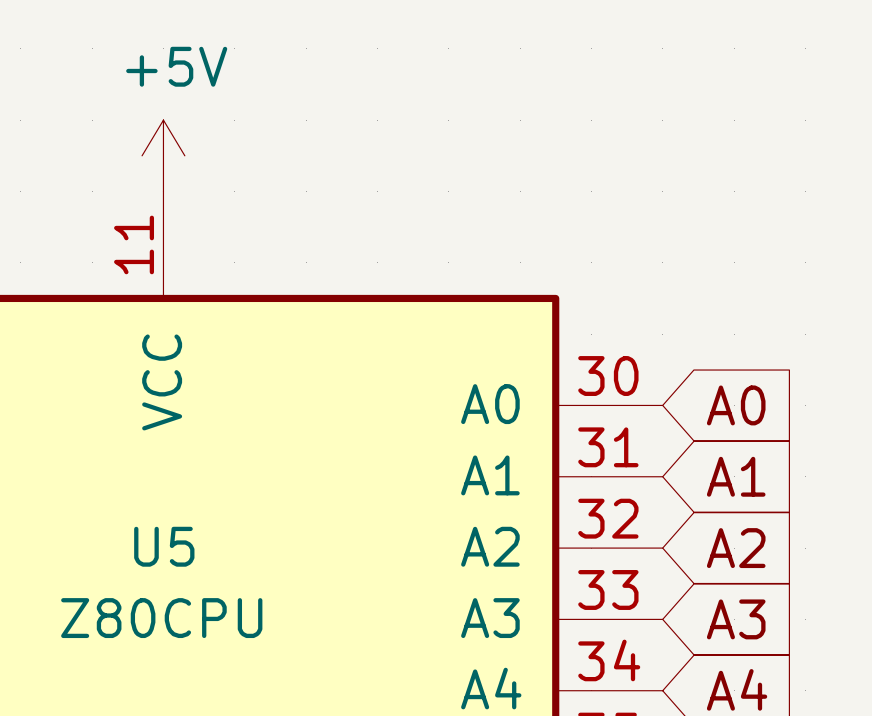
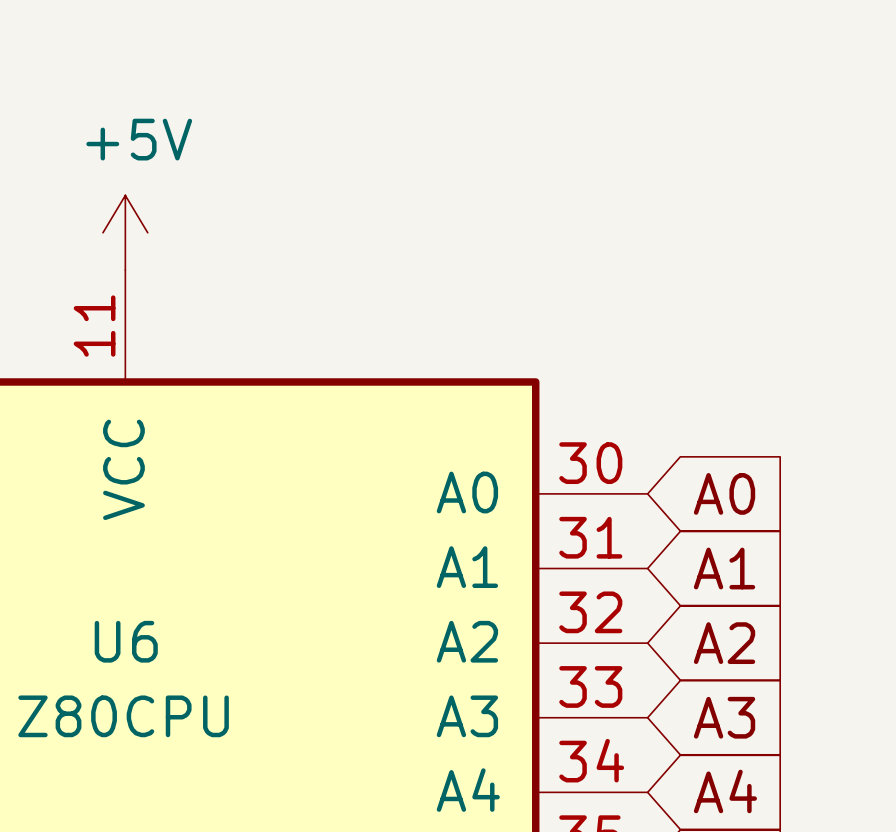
U5 name: U5 (164, 546) -> U6 (126, 641)

